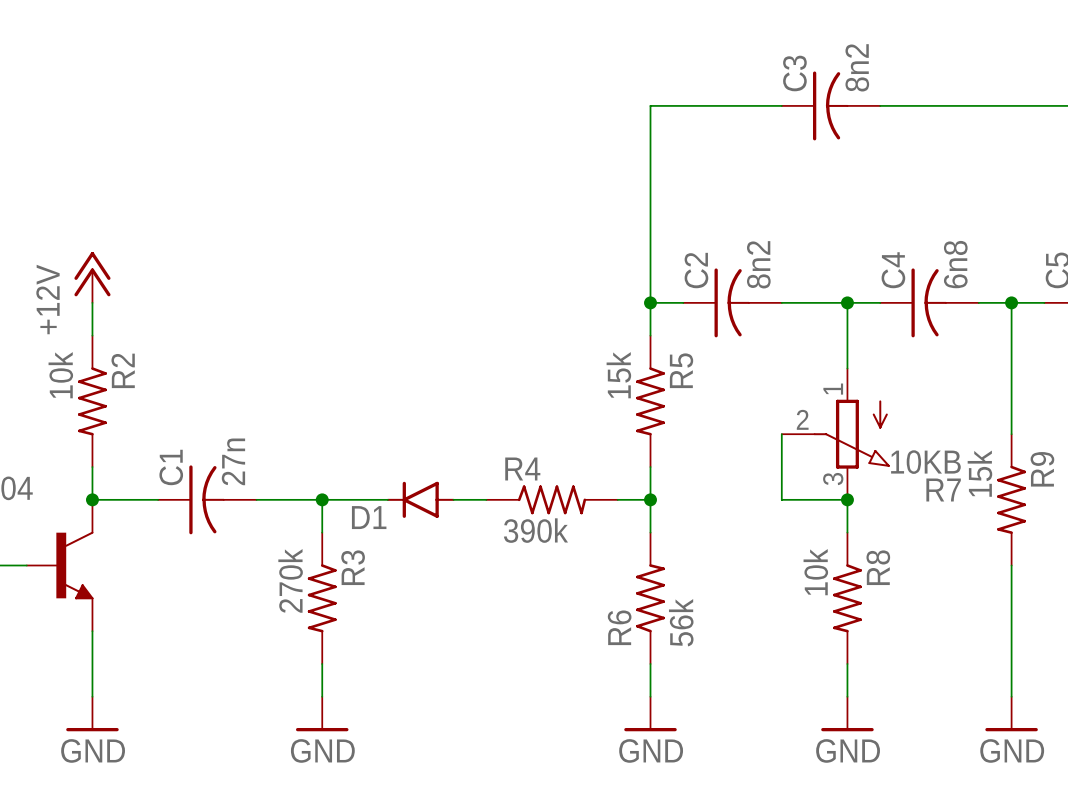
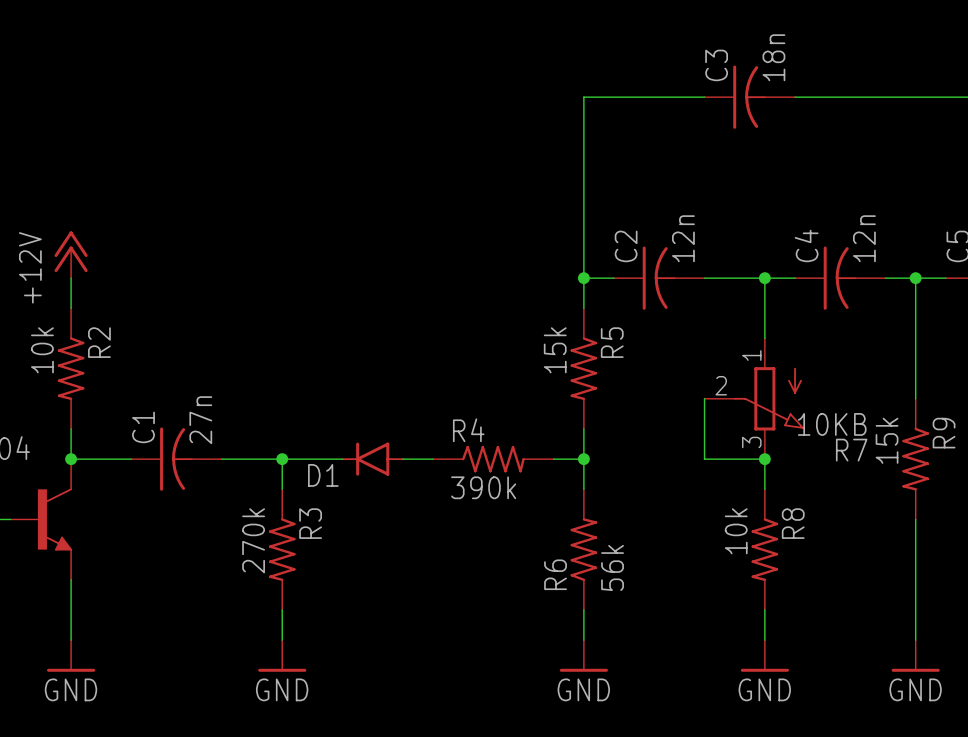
C3 value: 8n2 (857, 67) -> 18n (773, 57)
C2 value: 8n2 (758, 264) -> 12n (683, 238)
C4 value: 6n8 (955, 264) -> 12n (864, 238)

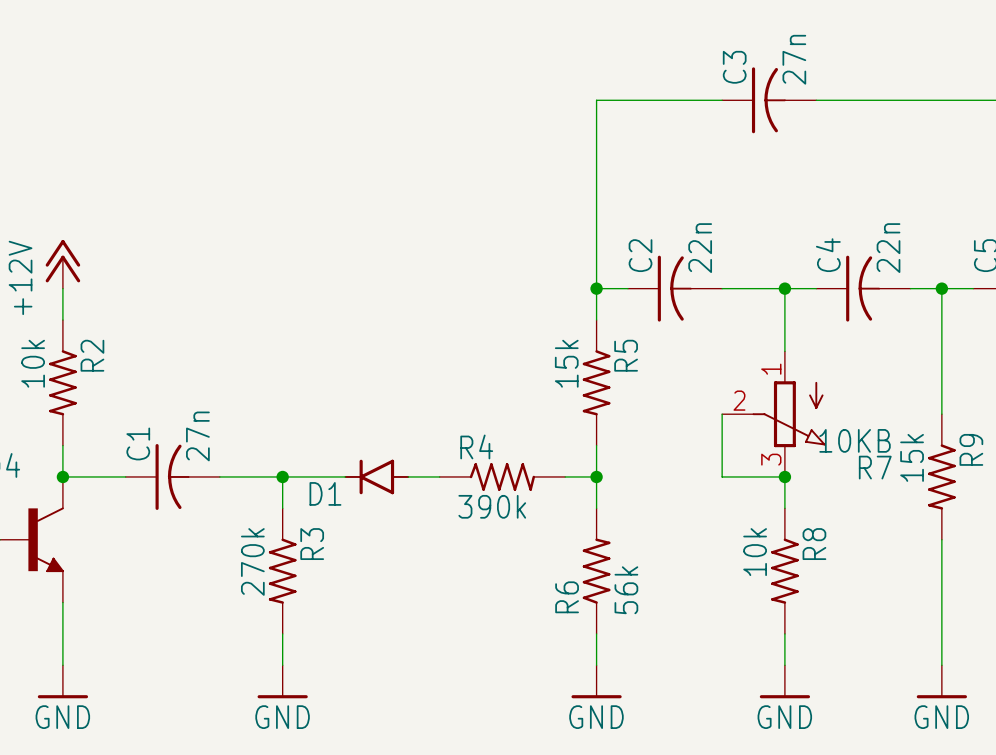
C3 value: 18n (773, 57) -> 27n (794, 59)
C2 value: 12n (683, 238) -> 22n (700, 248)
C4 value: 12n (864, 238) -> 22n (888, 248)

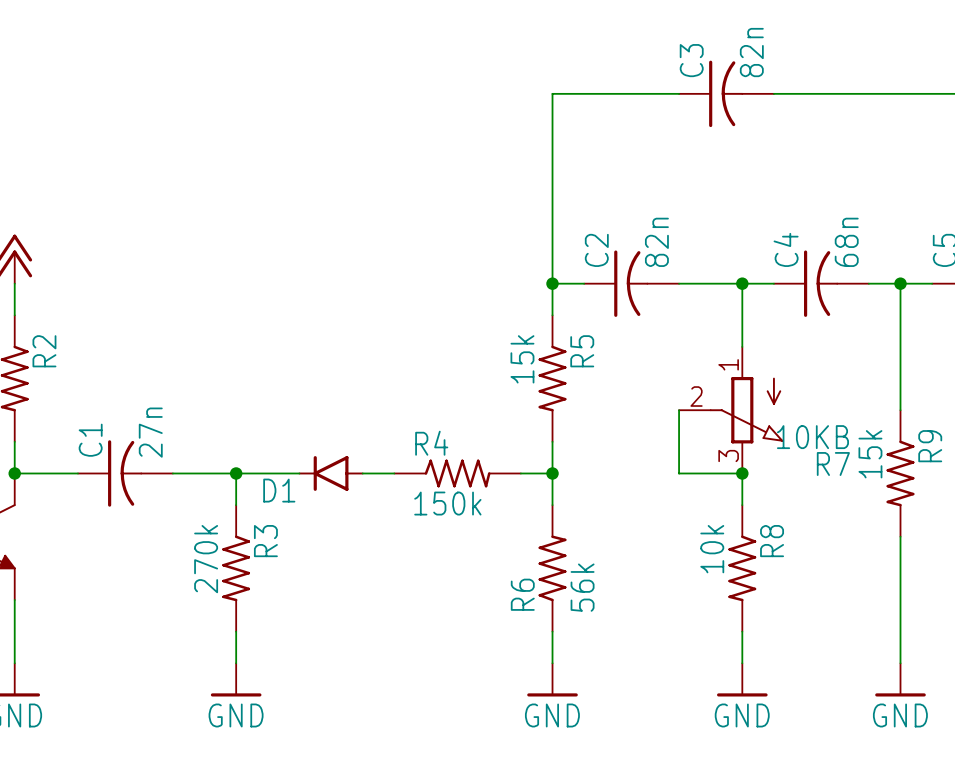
C3 value: 27n (794, 59) -> 82n (751, 52)
C2 value: 22n (700, 248) -> 82n (656, 242)
C4 value: 22n (888, 248) -> 68n (846, 242)
R4 value: 390k (492, 506) -> 150k (447, 503)

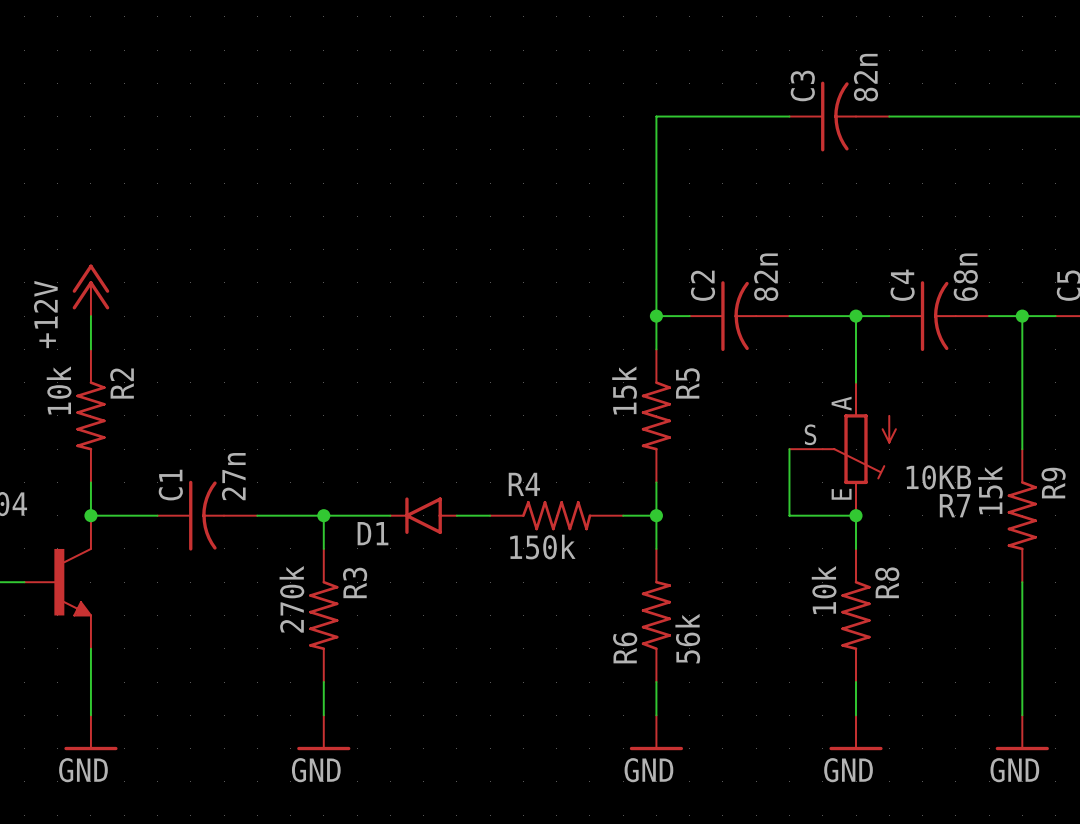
R7 symbol: [679, 346, 784, 474] -> [789, 382, 897, 516]

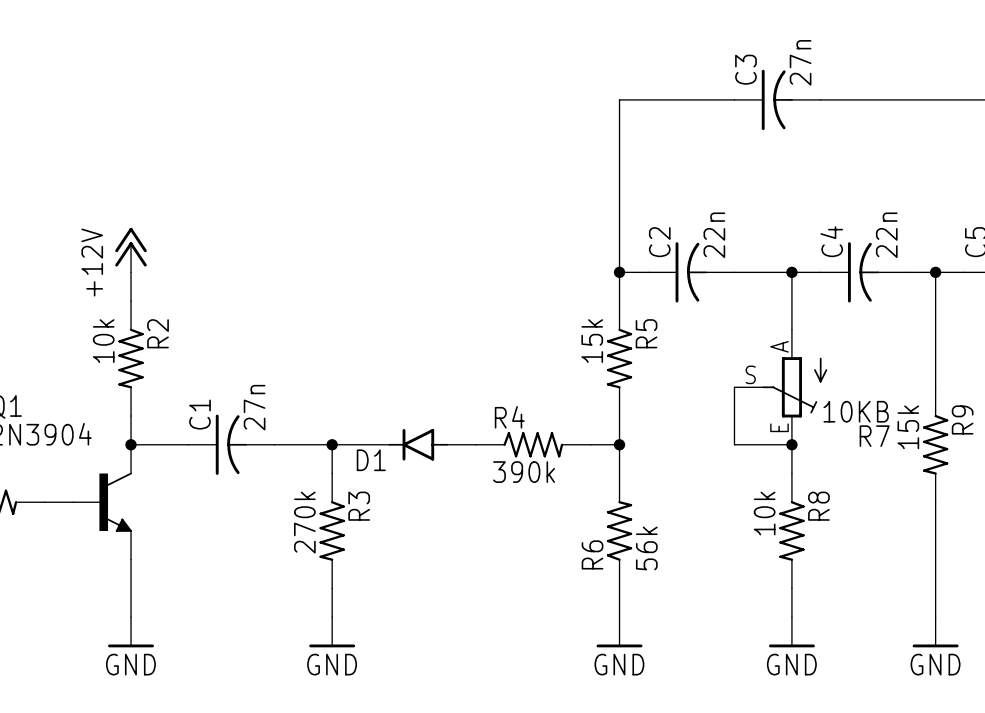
C3 value: 82n (865, 77) -> 27n (800, 62)
C2 value: 82n (766, 277) -> 22n (714, 235)
C4 value: 68n (965, 277) -> 22n (886, 235)
R4 value: 150k (542, 547) -> 390k (524, 472)

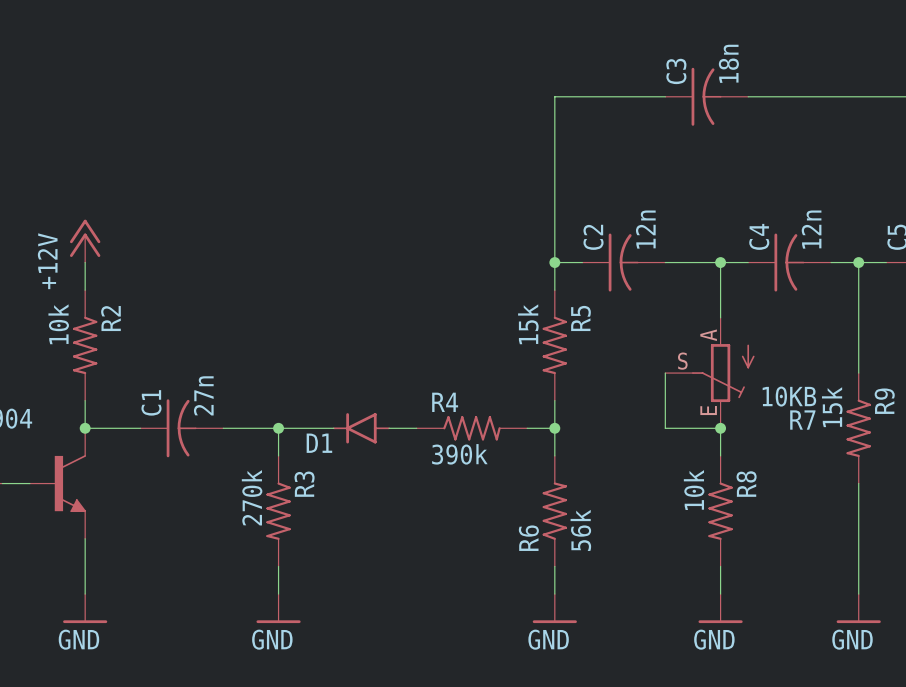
C3 value: 27n (800, 62) -> 18n (728, 63)
C2 value: 22n (714, 235) -> 12n (645, 229)
C4 value: 22n (886, 235) -> 12n (811, 229)

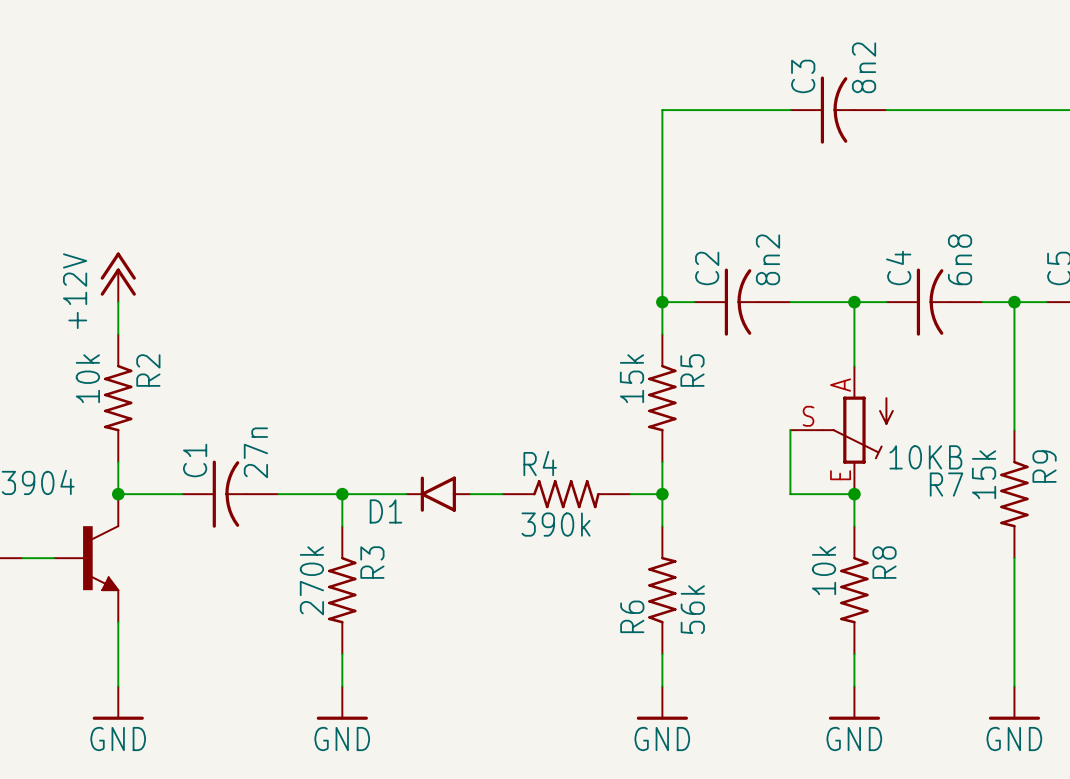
C3 value: 18n (728, 63) -> 8n2 (864, 67)
C2 value: 12n (645, 229) -> 8n2 (768, 259)
C4 value: 12n (811, 229) -> 6n8 (960, 259)

